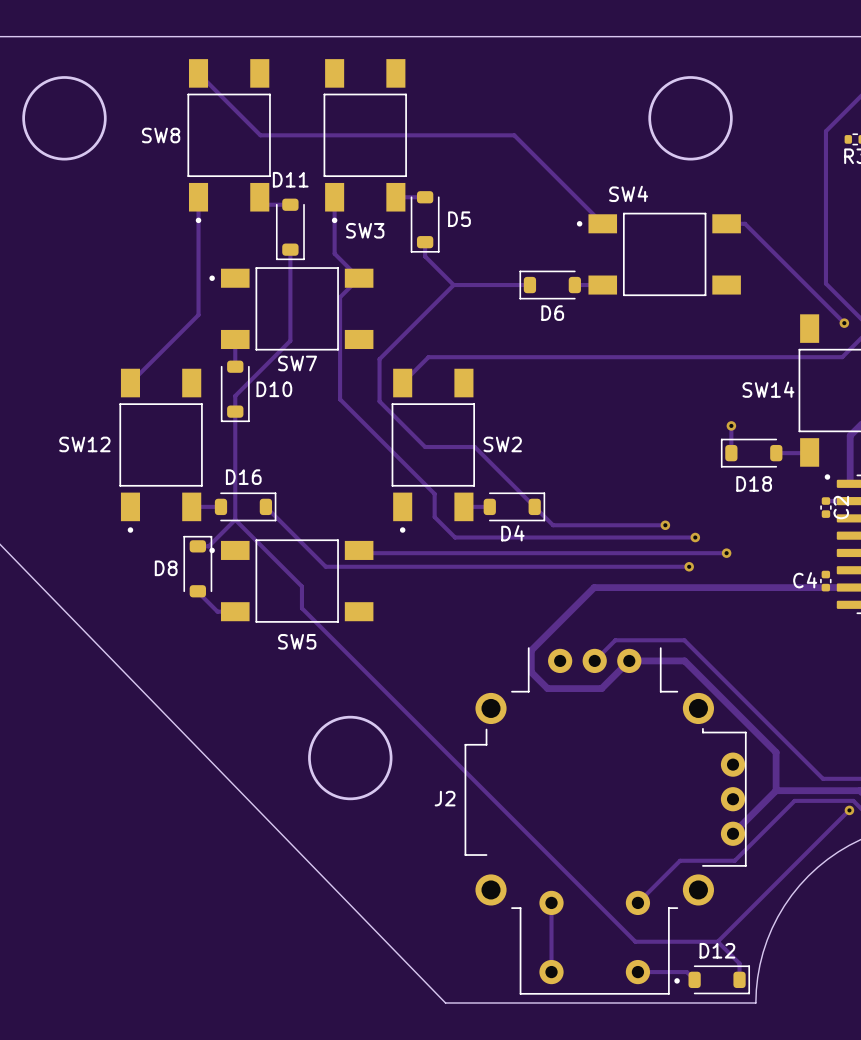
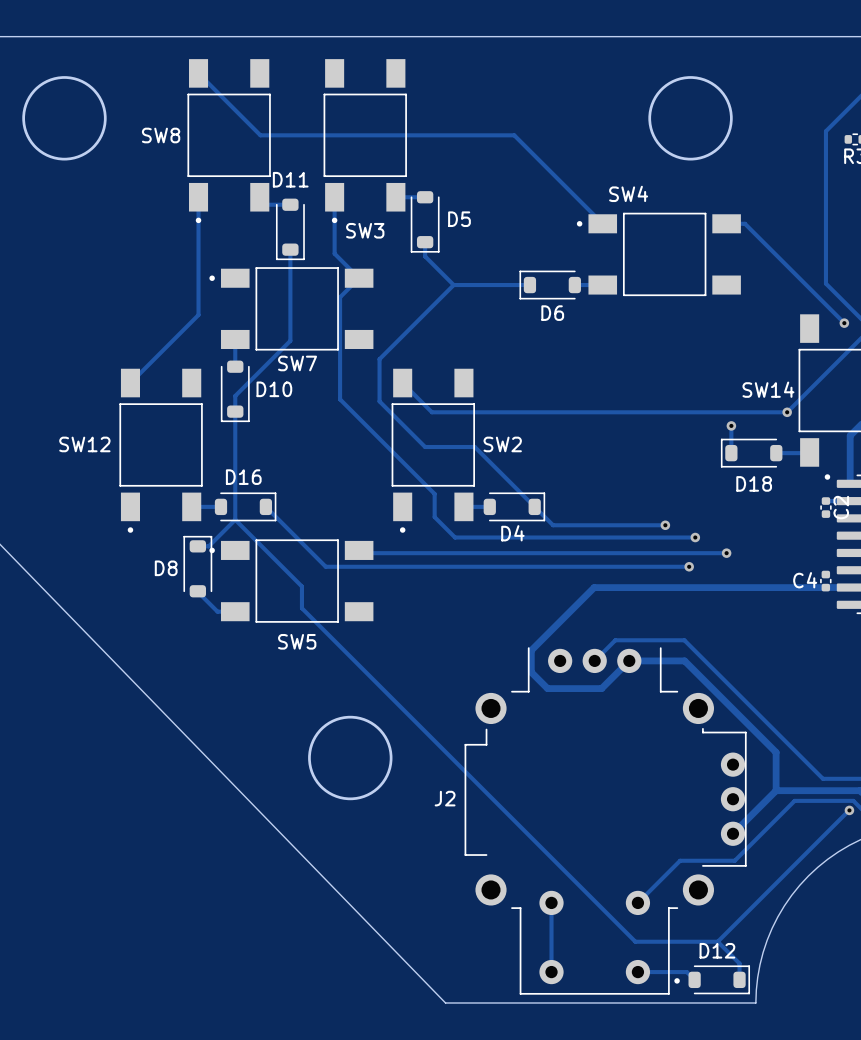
track: (842, 357) (428, 357) (402, 383) -> (842, 357) (787, 412) (431, 412) (402, 383)
via: none -> (787, 412)

